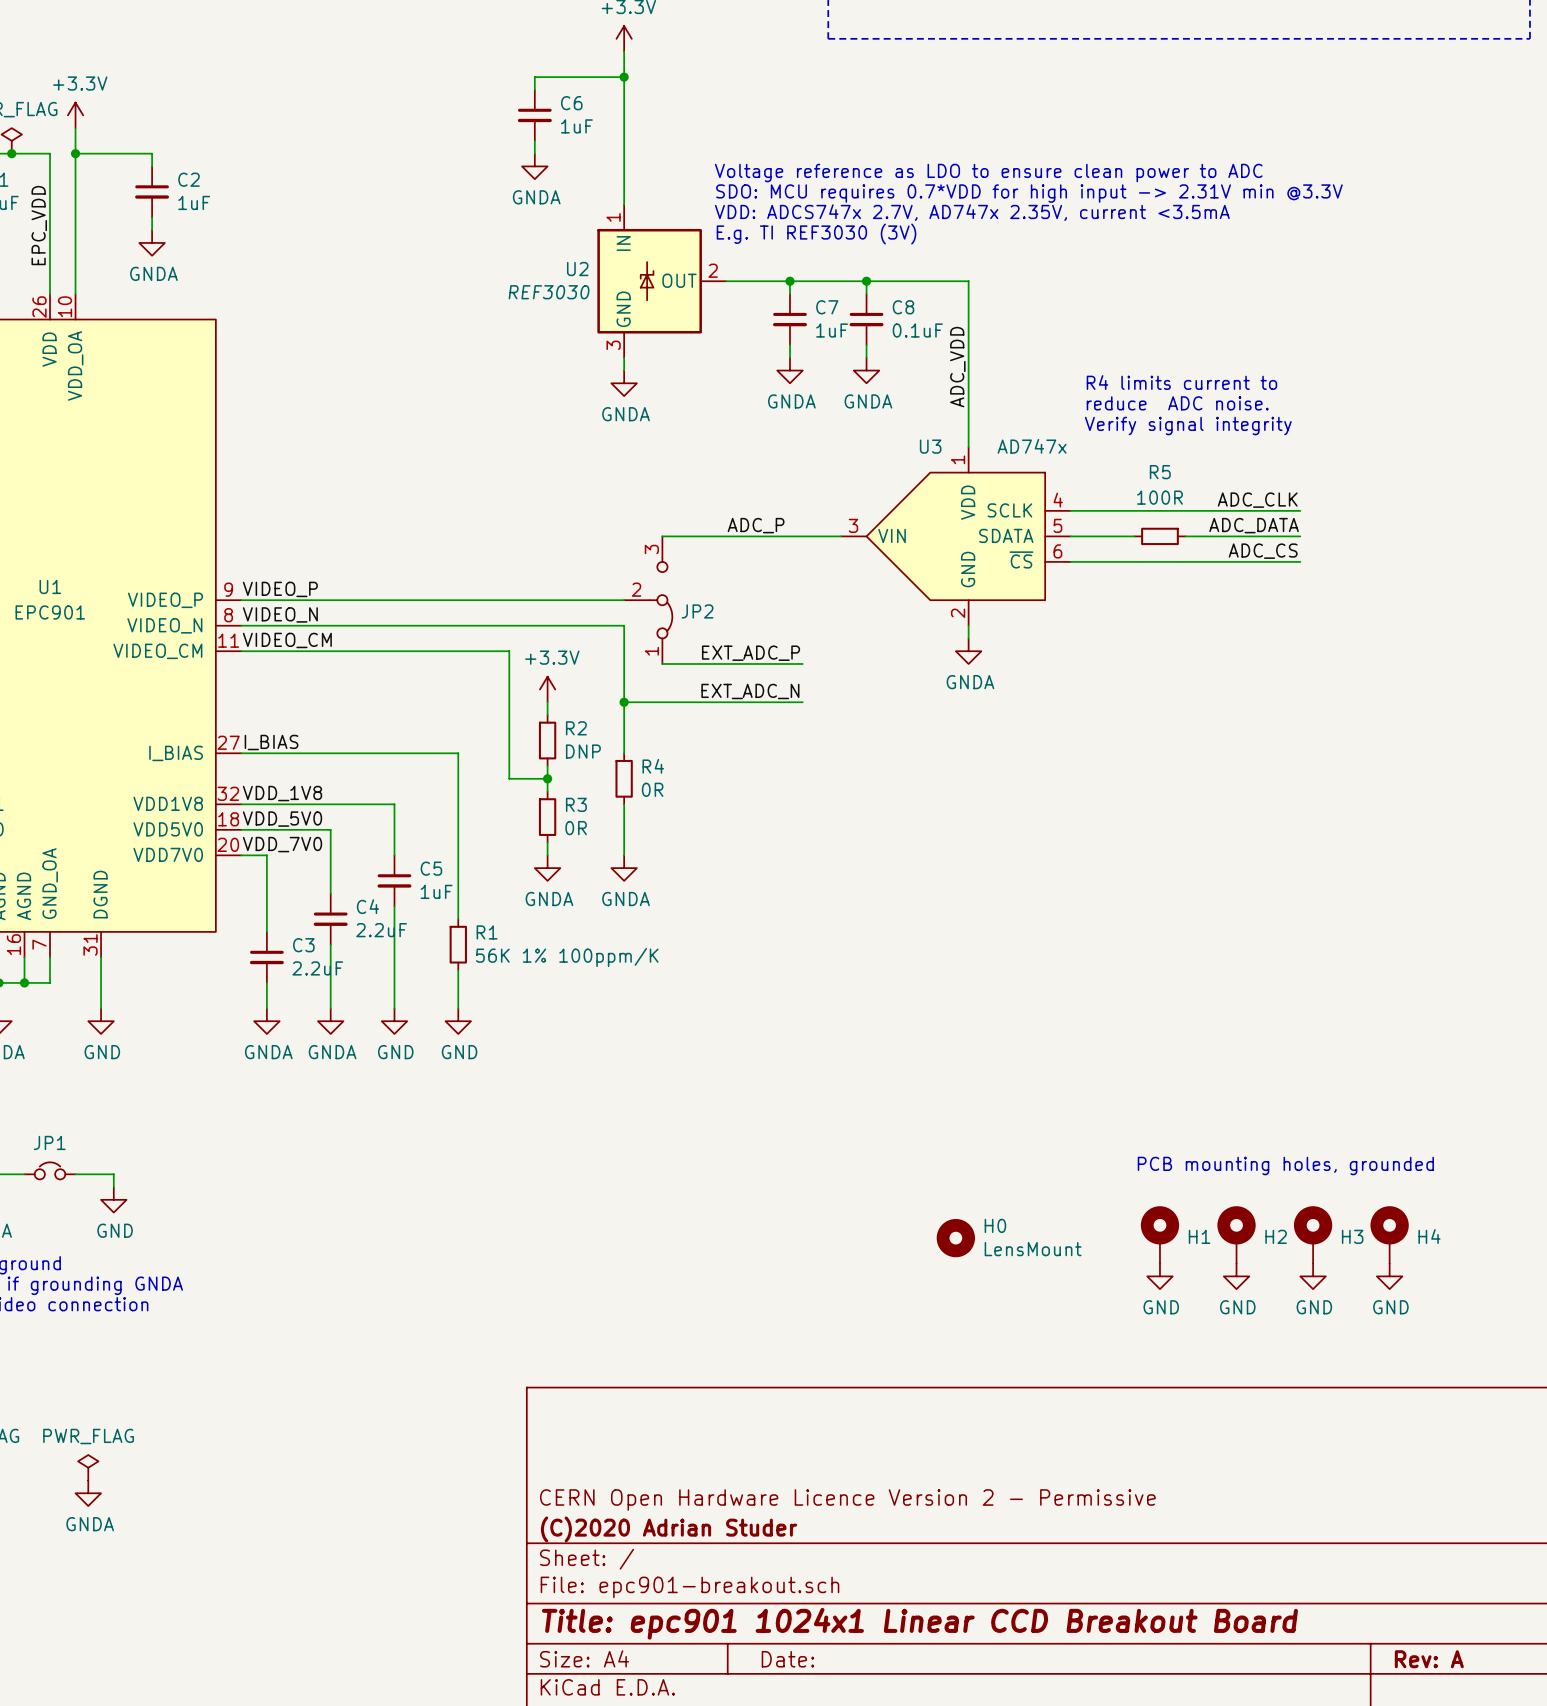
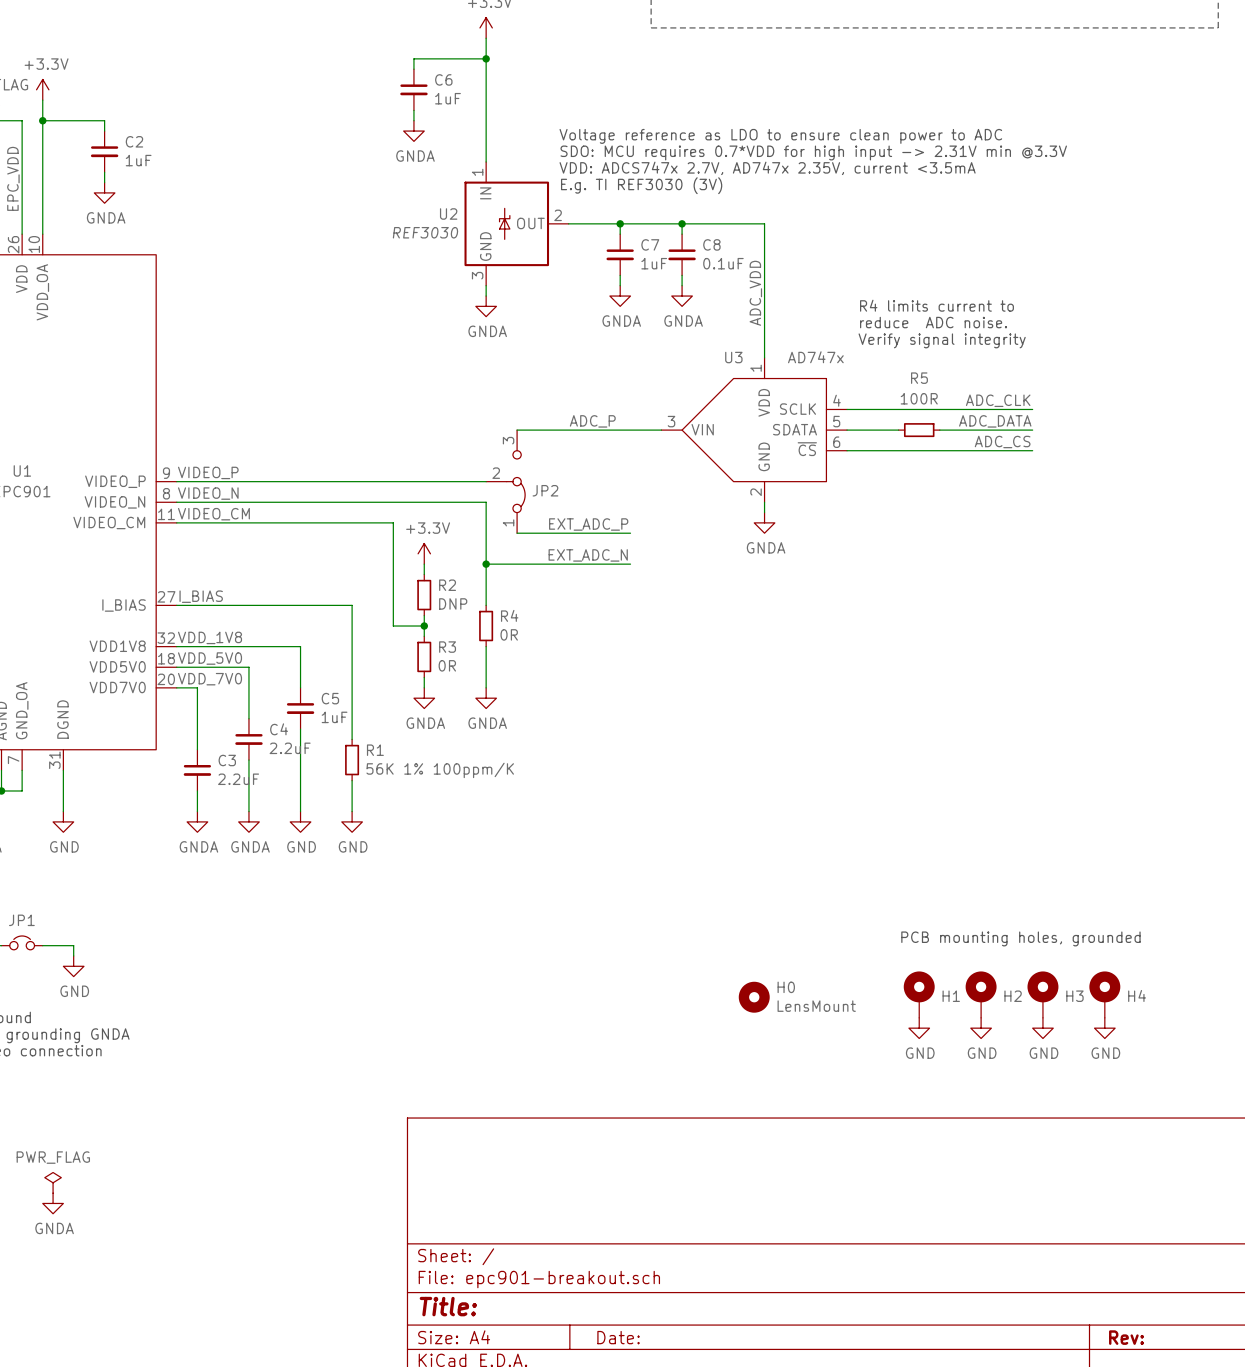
title block: CERN Open Hardware Licence Version 2 - Permissive (847, 1500) -> none
title block: (C)2020 Adrian Studer (669, 1529) -> none
title block: Title: epc901 1024x1 Linear CCD Breakout Board (919, 1623) -> Title: (448, 1306)
title block: Rev: A (1429, 1659) -> Rev: (1126, 1337)

